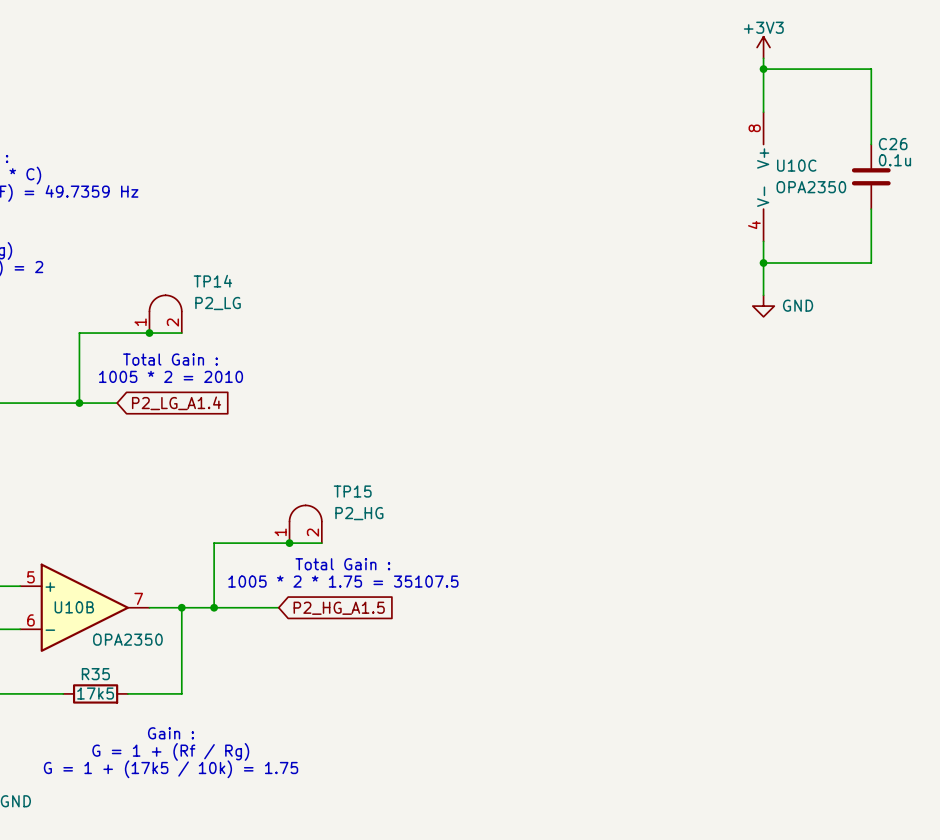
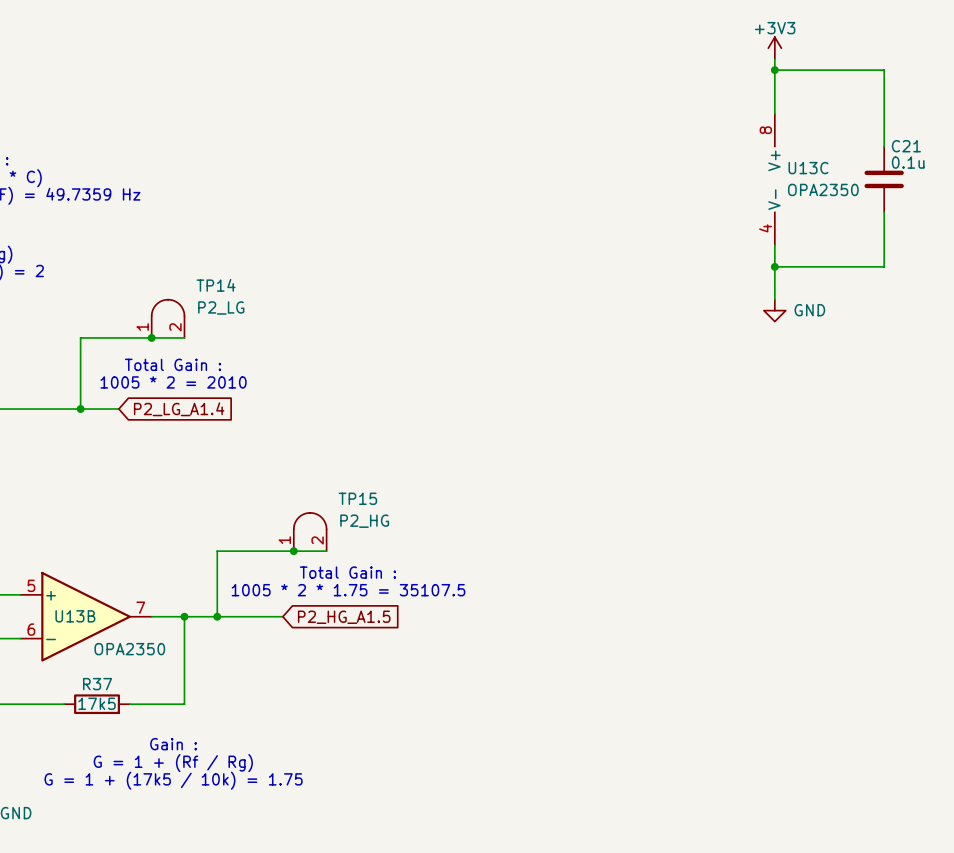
C26 name: C26 (893, 144) -> C21 (906, 146)
U10C name: U10C (796, 165) -> U13C (808, 168)
U10B name: U10B (74, 607) -> U13B (75, 616)
R35 name: R35 (95, 674) -> R37 (97, 684)

